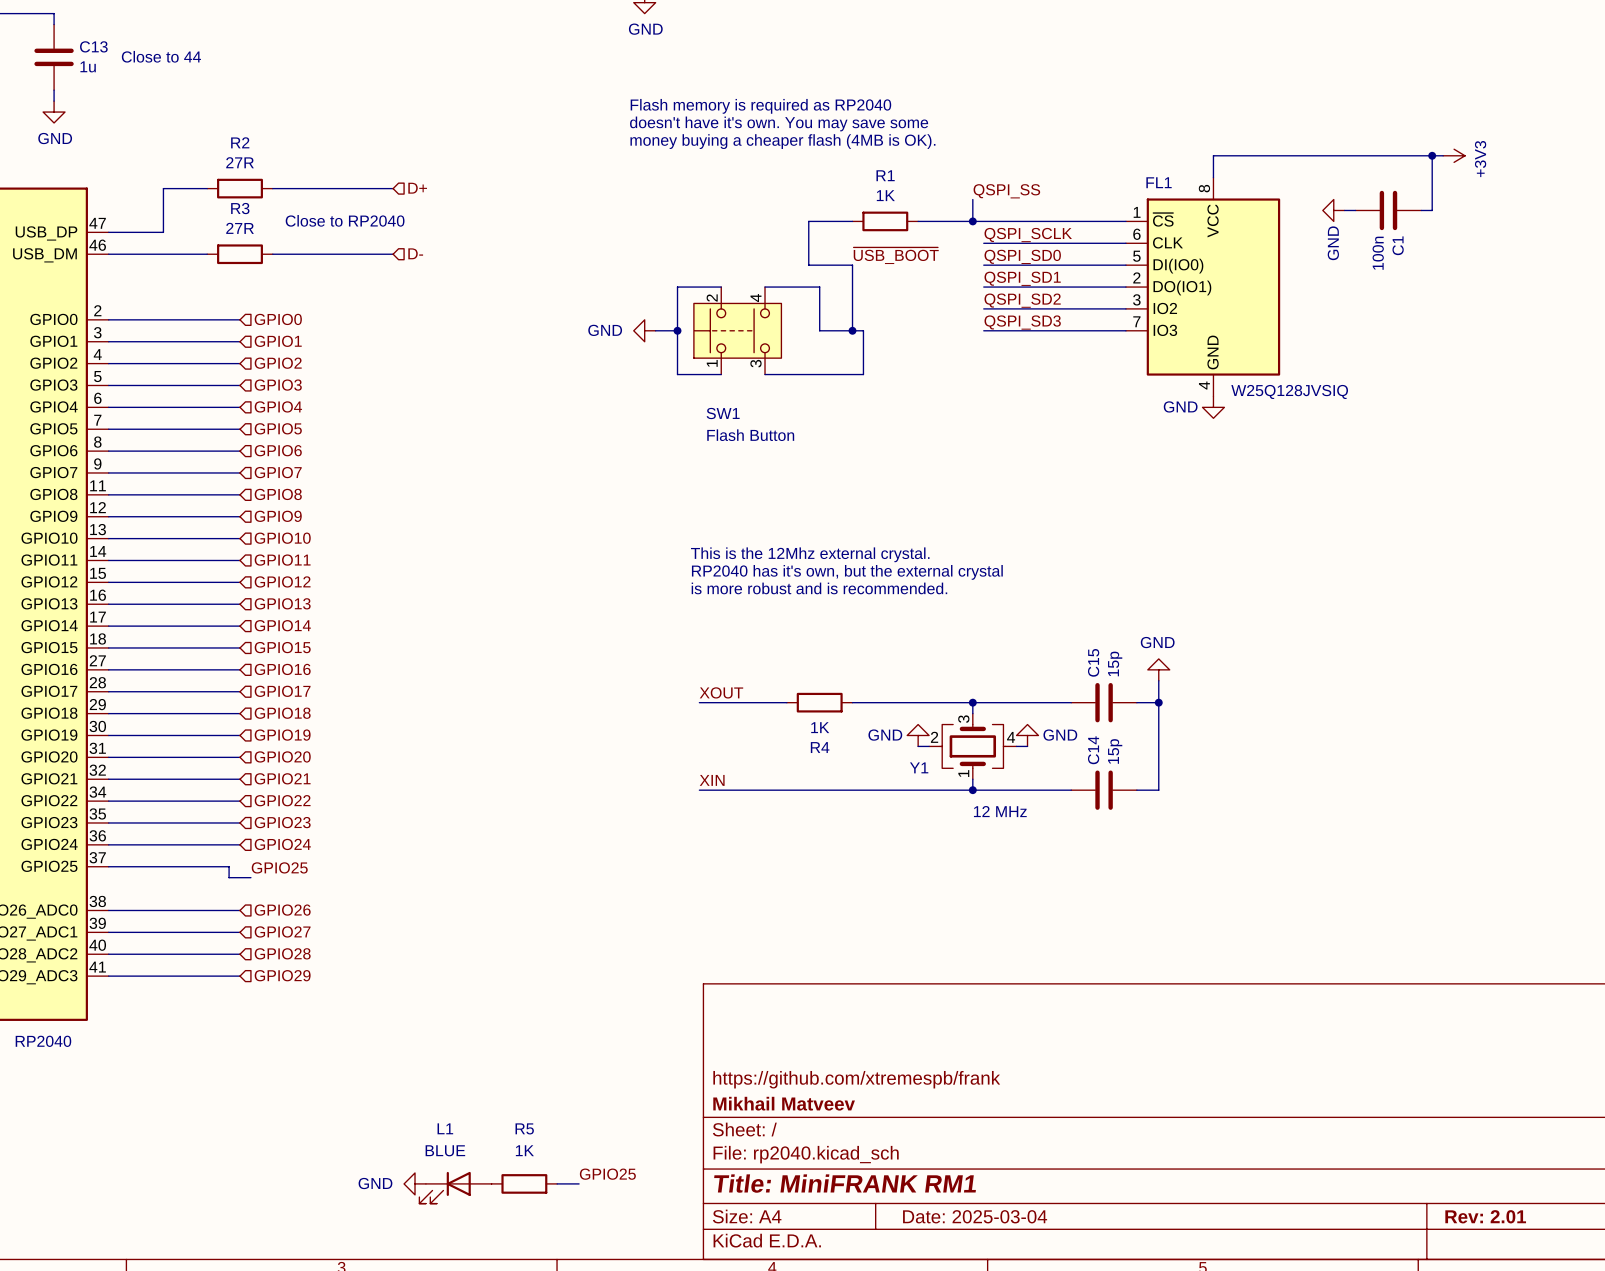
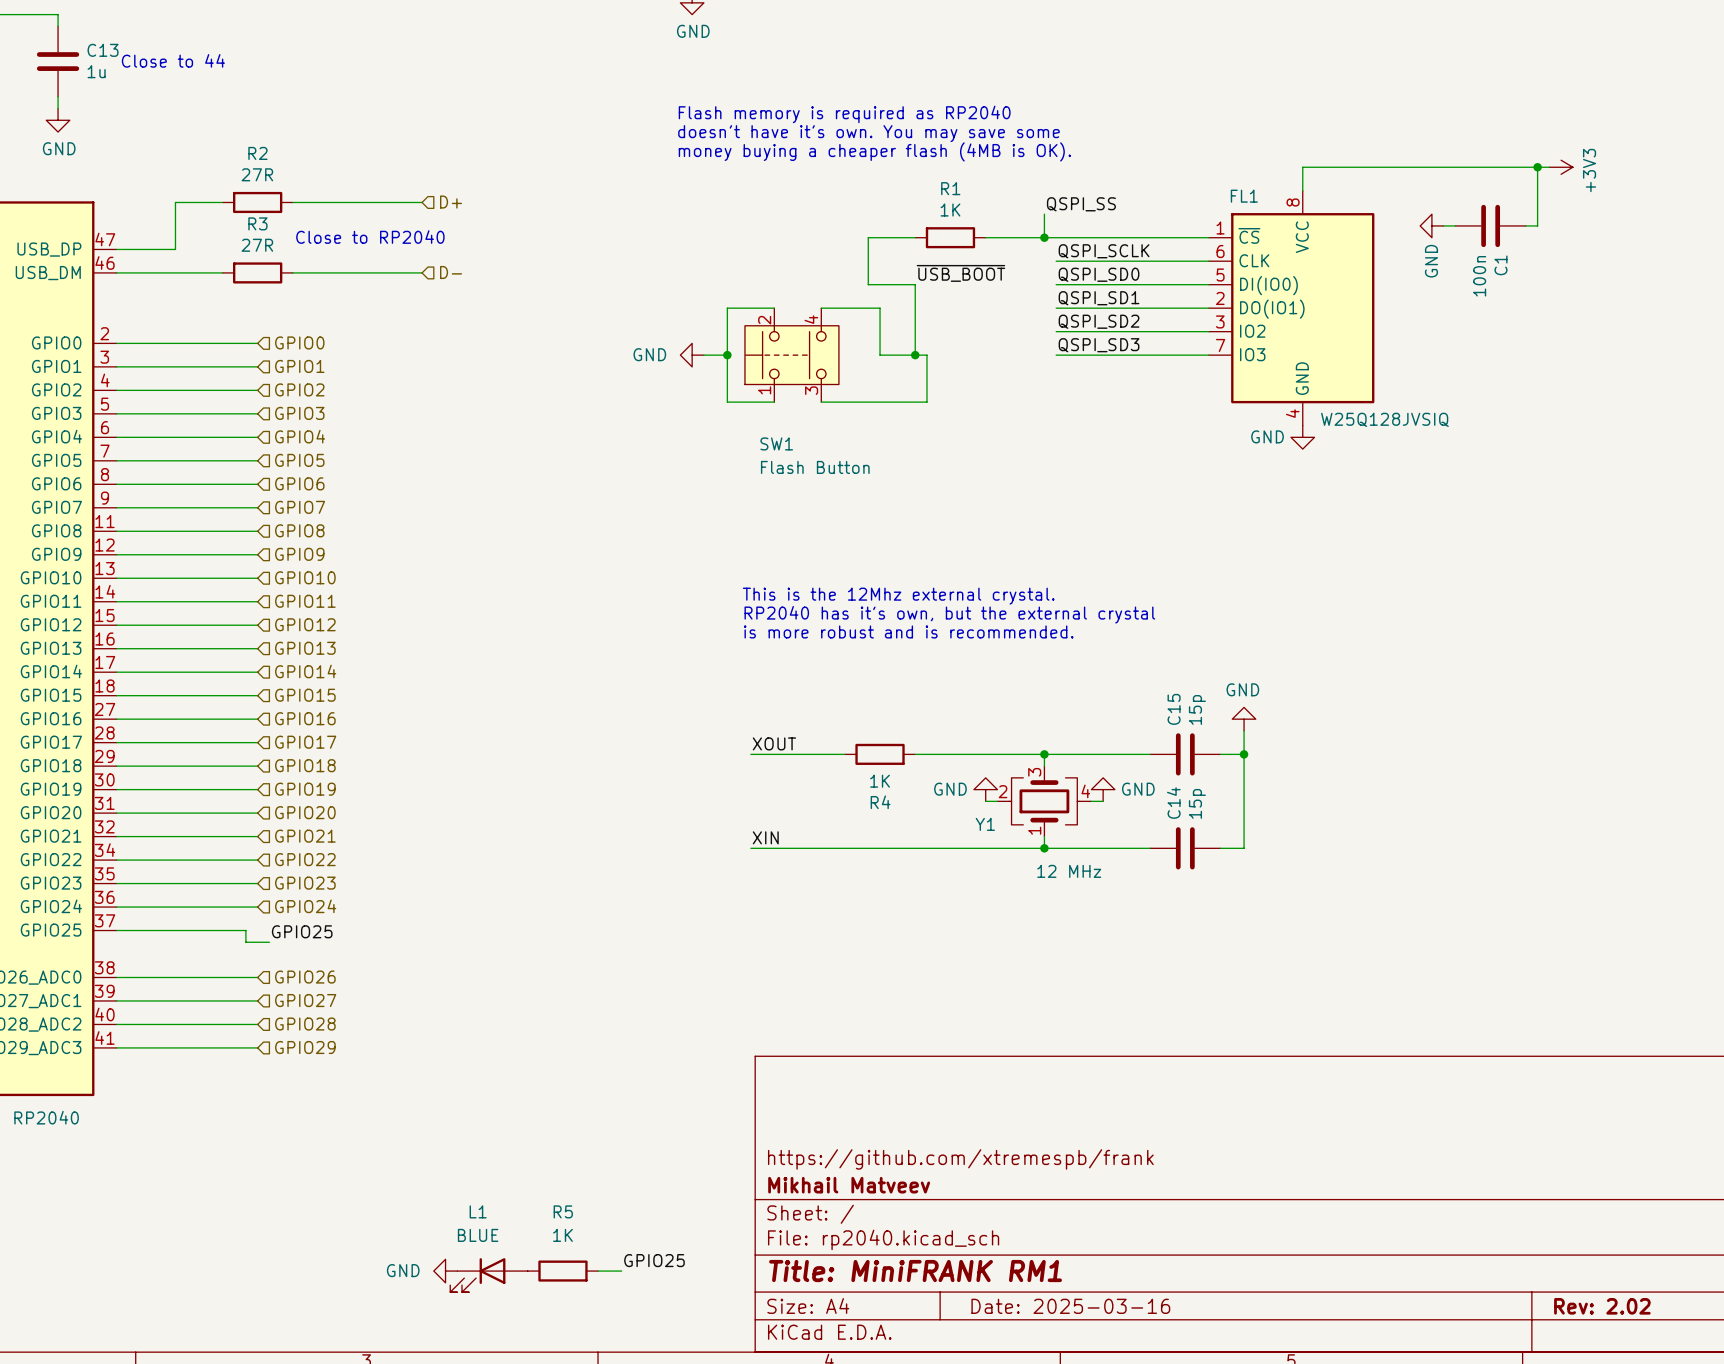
title block: Date: 2025-03-04 (975, 1216) -> Date: 2025-03-16 (1070, 1306)
title block: Rev: 2.01 (1485, 1216) -> Rev: 2.02 (1602, 1306)

